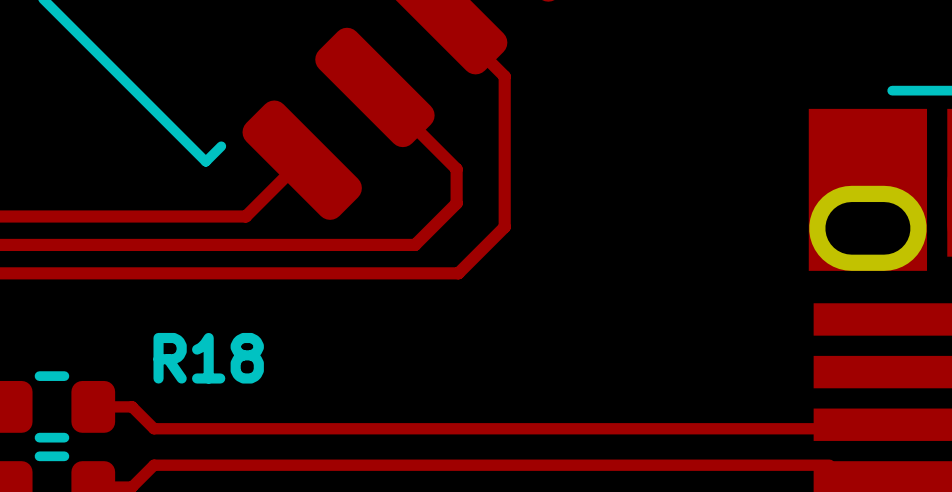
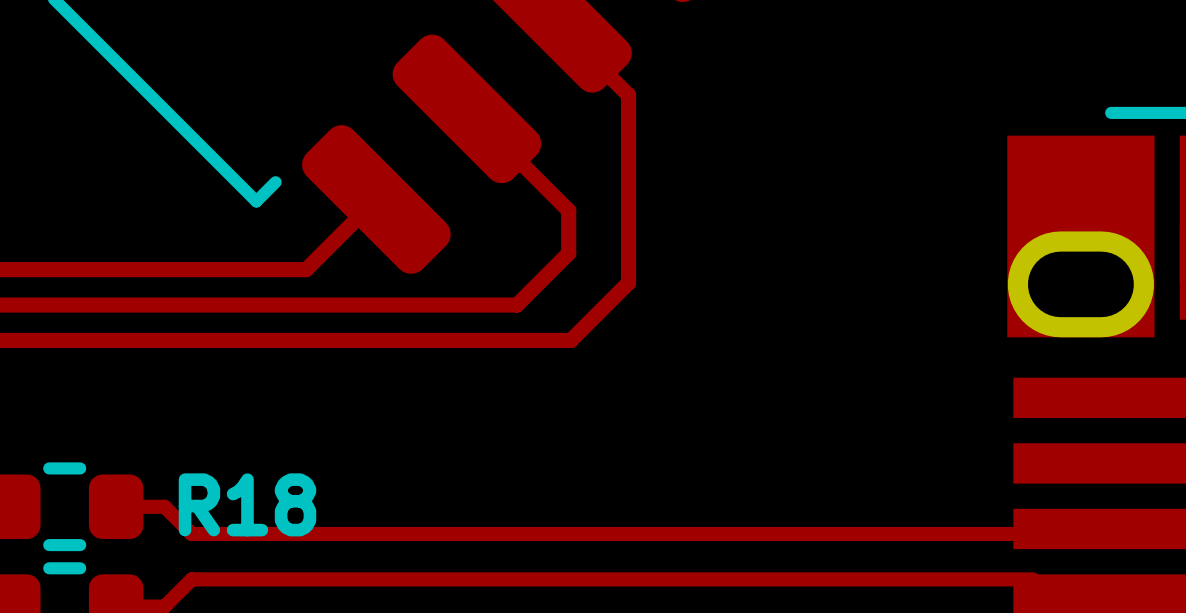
R18 name position: R18 (208, 358) -> R18 (247, 504)

